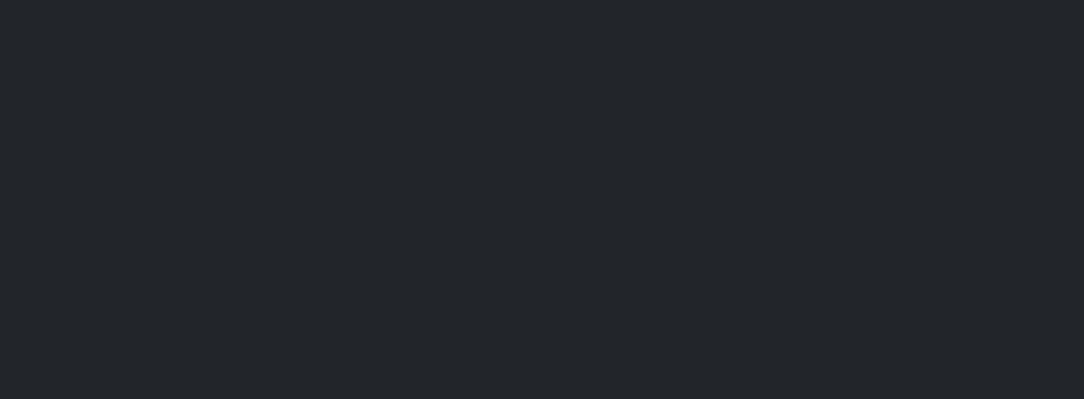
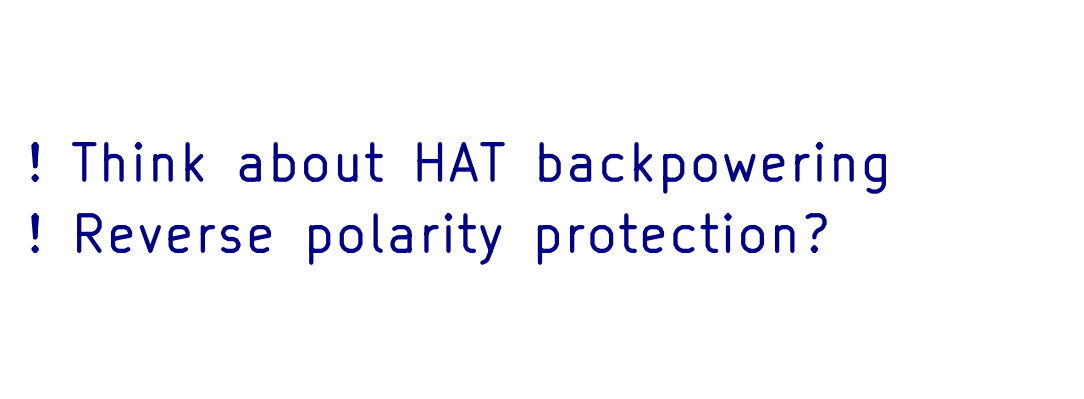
text: none -> ! Think about HAT backpowering (458, 167)
text: none -> ! Reverse polarity protection? (429, 238)

